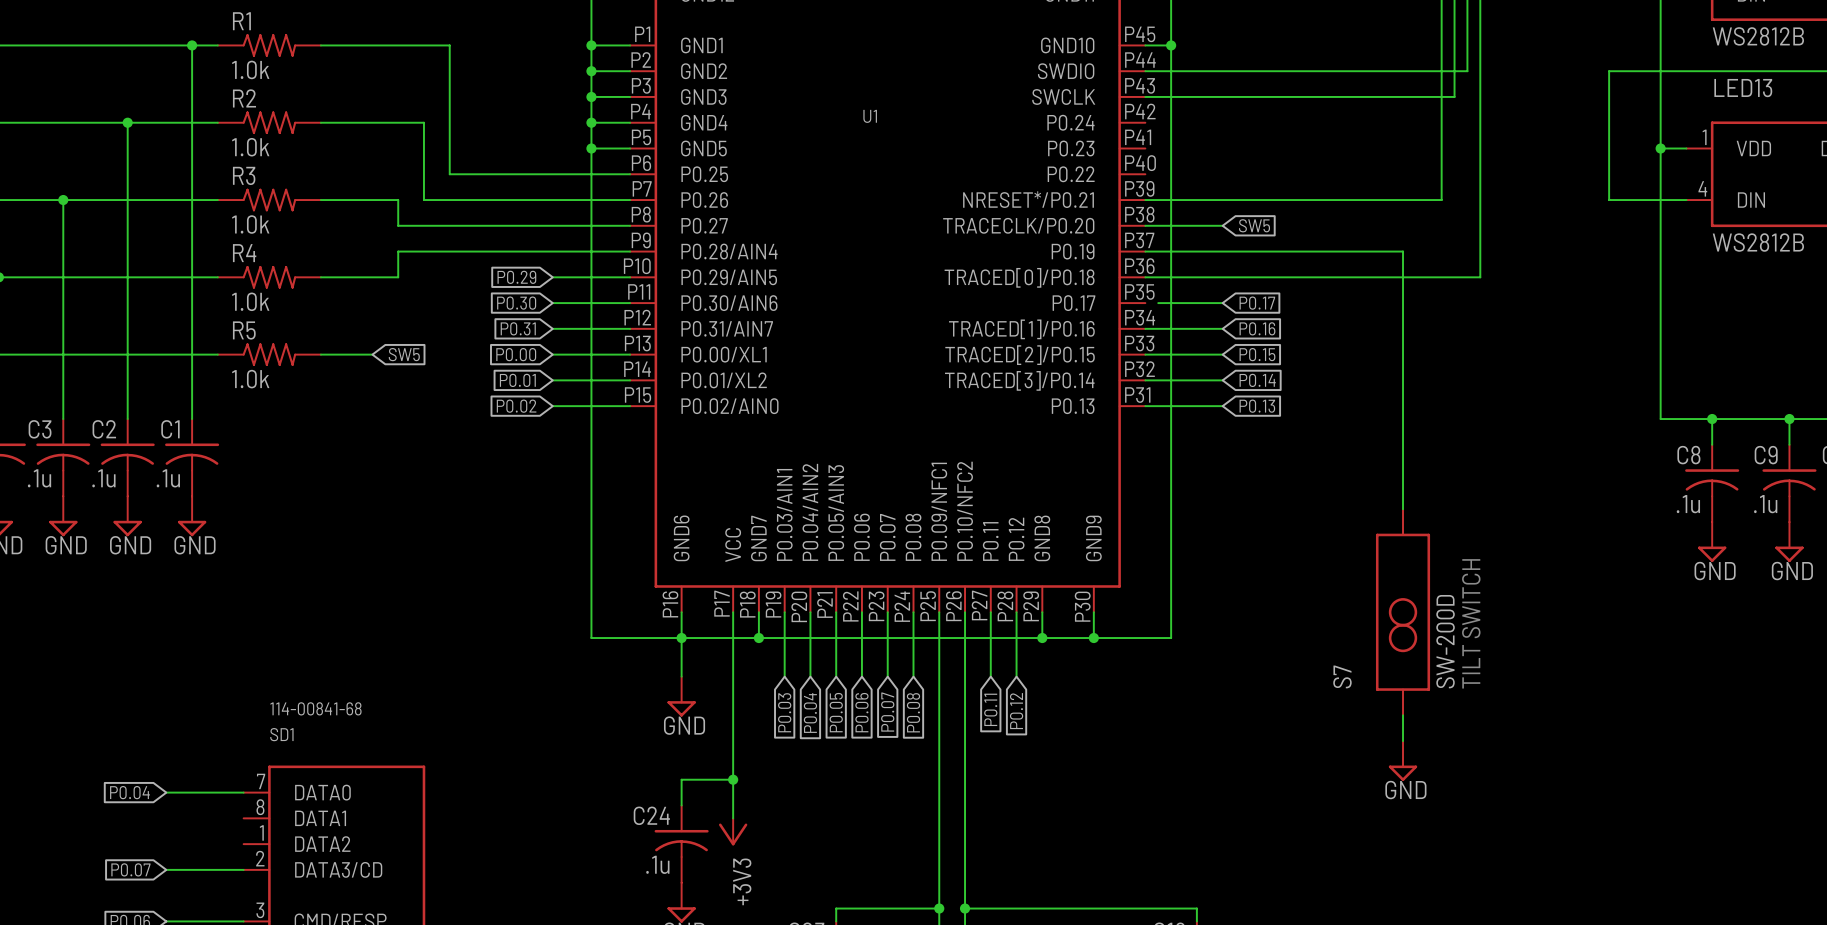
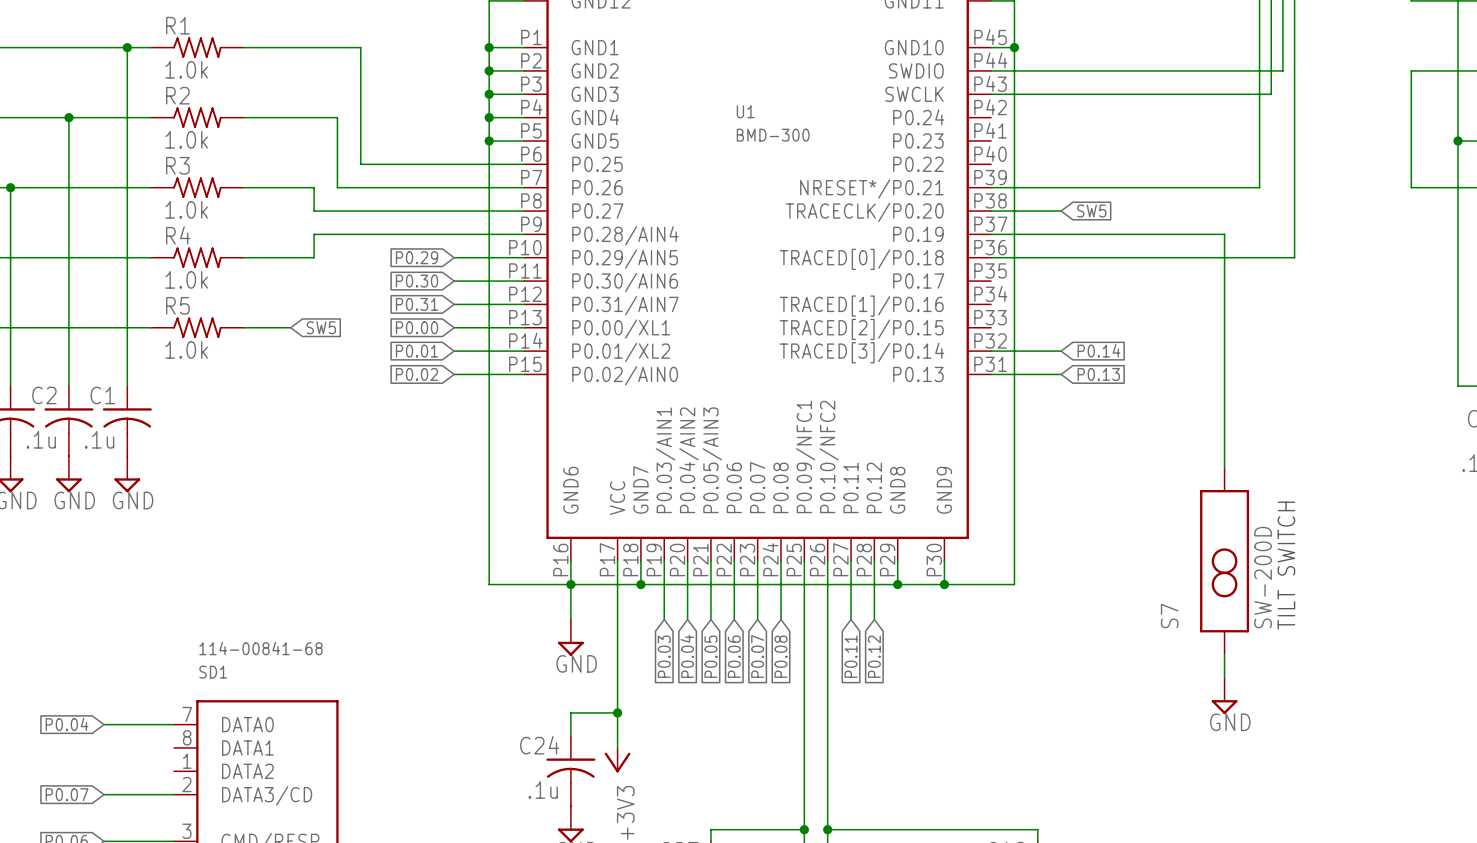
U1 value: none -> BMD-300 (773, 135)
wire: (1158, 303) (1222, 303) -> none
global label: P0.17 (1257, 303) -> none
wire: (1145, 328) (1222, 328) -> none
global label: P0.16 (1257, 328) -> none
wire: (1145, 354) (1222, 354) -> none
global label: P0.15 (1257, 354) -> none

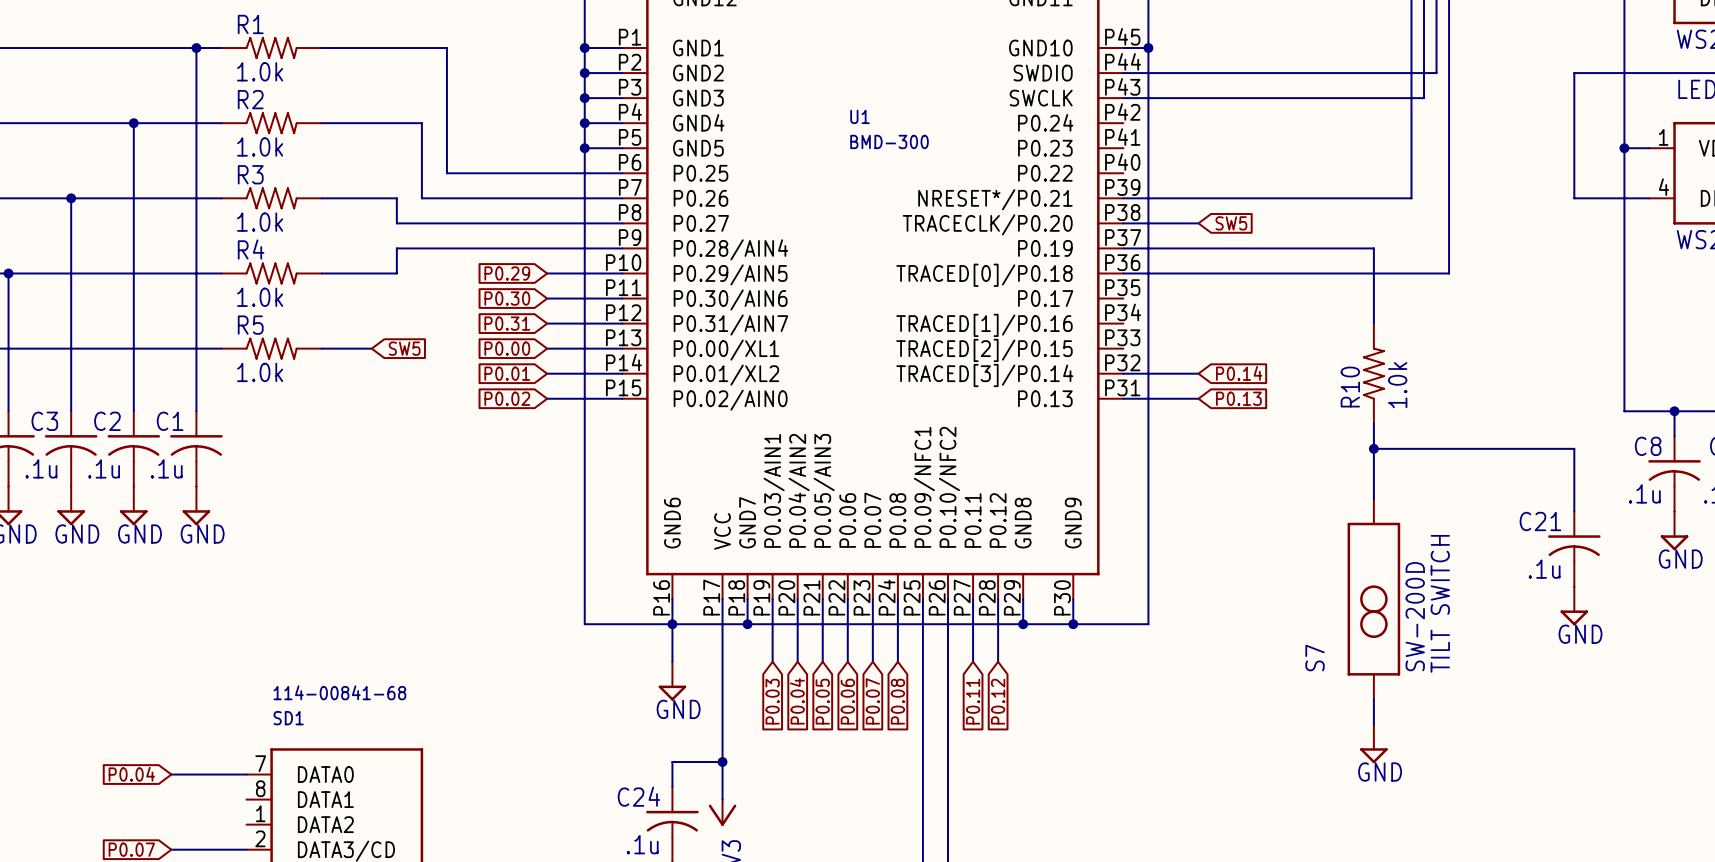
R10: none -> 1.0k (1373, 373)
wire: none -> (1373, 448) (1574, 448) (1574, 511)
junction: none -> (1373, 448)
C21: none -> .1u (1574, 549)
power symbol: none -> GND (1574, 606)

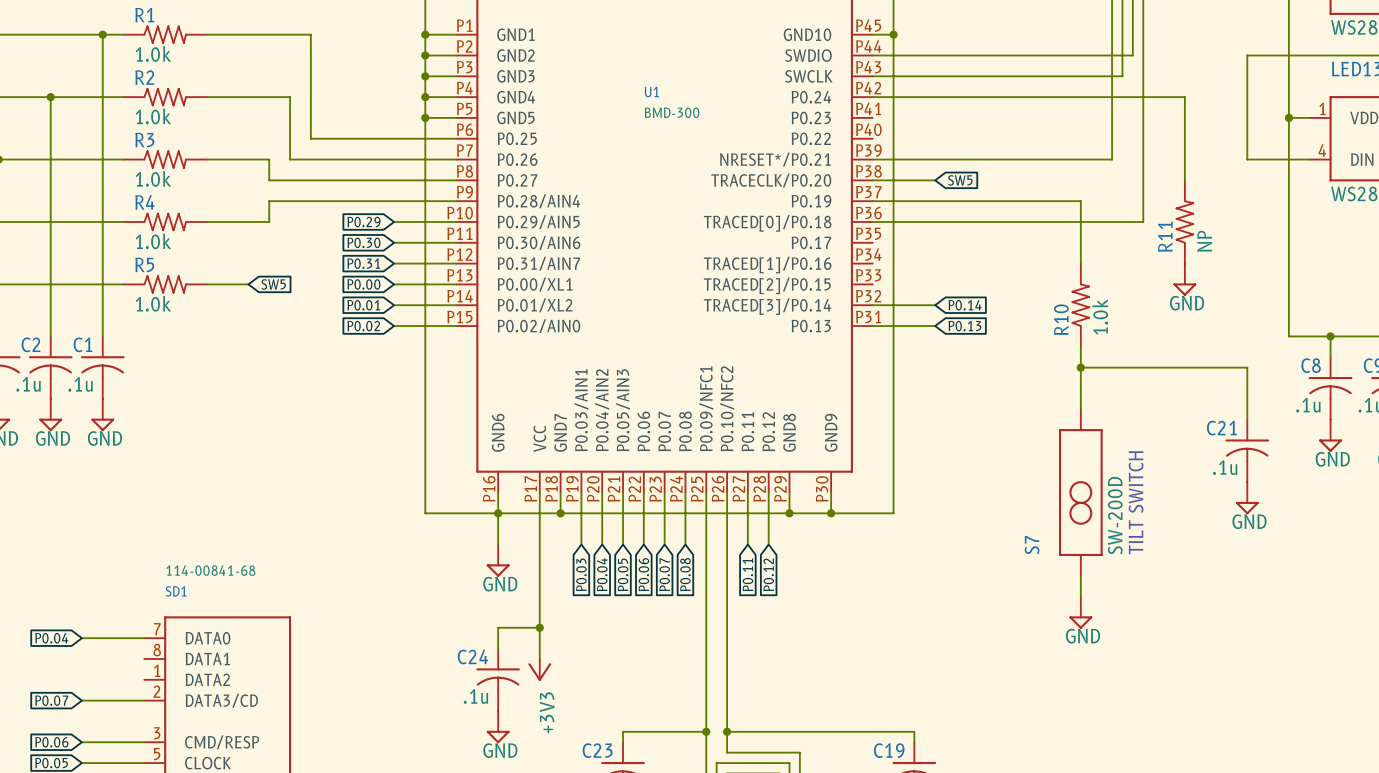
wire: none -> (872, 97) (1184, 97) (1184, 180)
R11: none -> NP (1184, 221)
power symbol: none -> GND (1184, 279)

